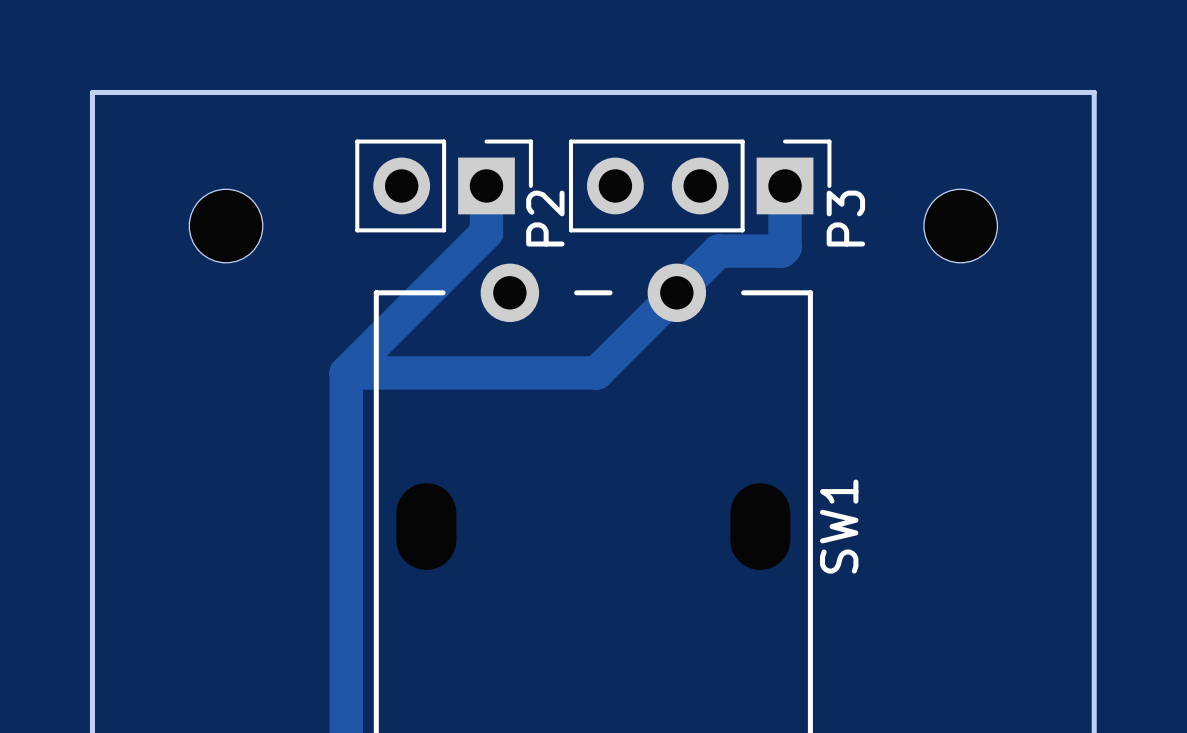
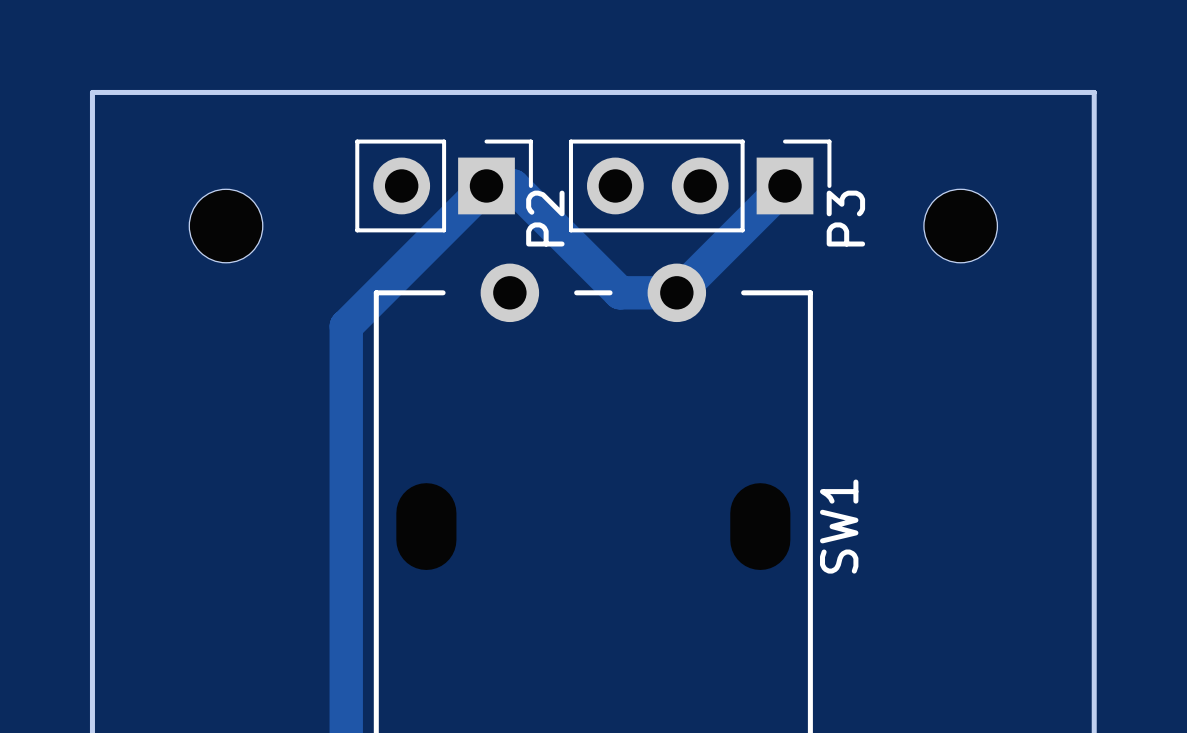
track: (486, 185) (486, 232) (346, 372) (596, 372) (718, 251) (781, 251) (785, 247) (785, 185) -> (346, 372) (346, 326) (486, 185) (513, 185) (620, 292) (678, 292) (785, 185)

